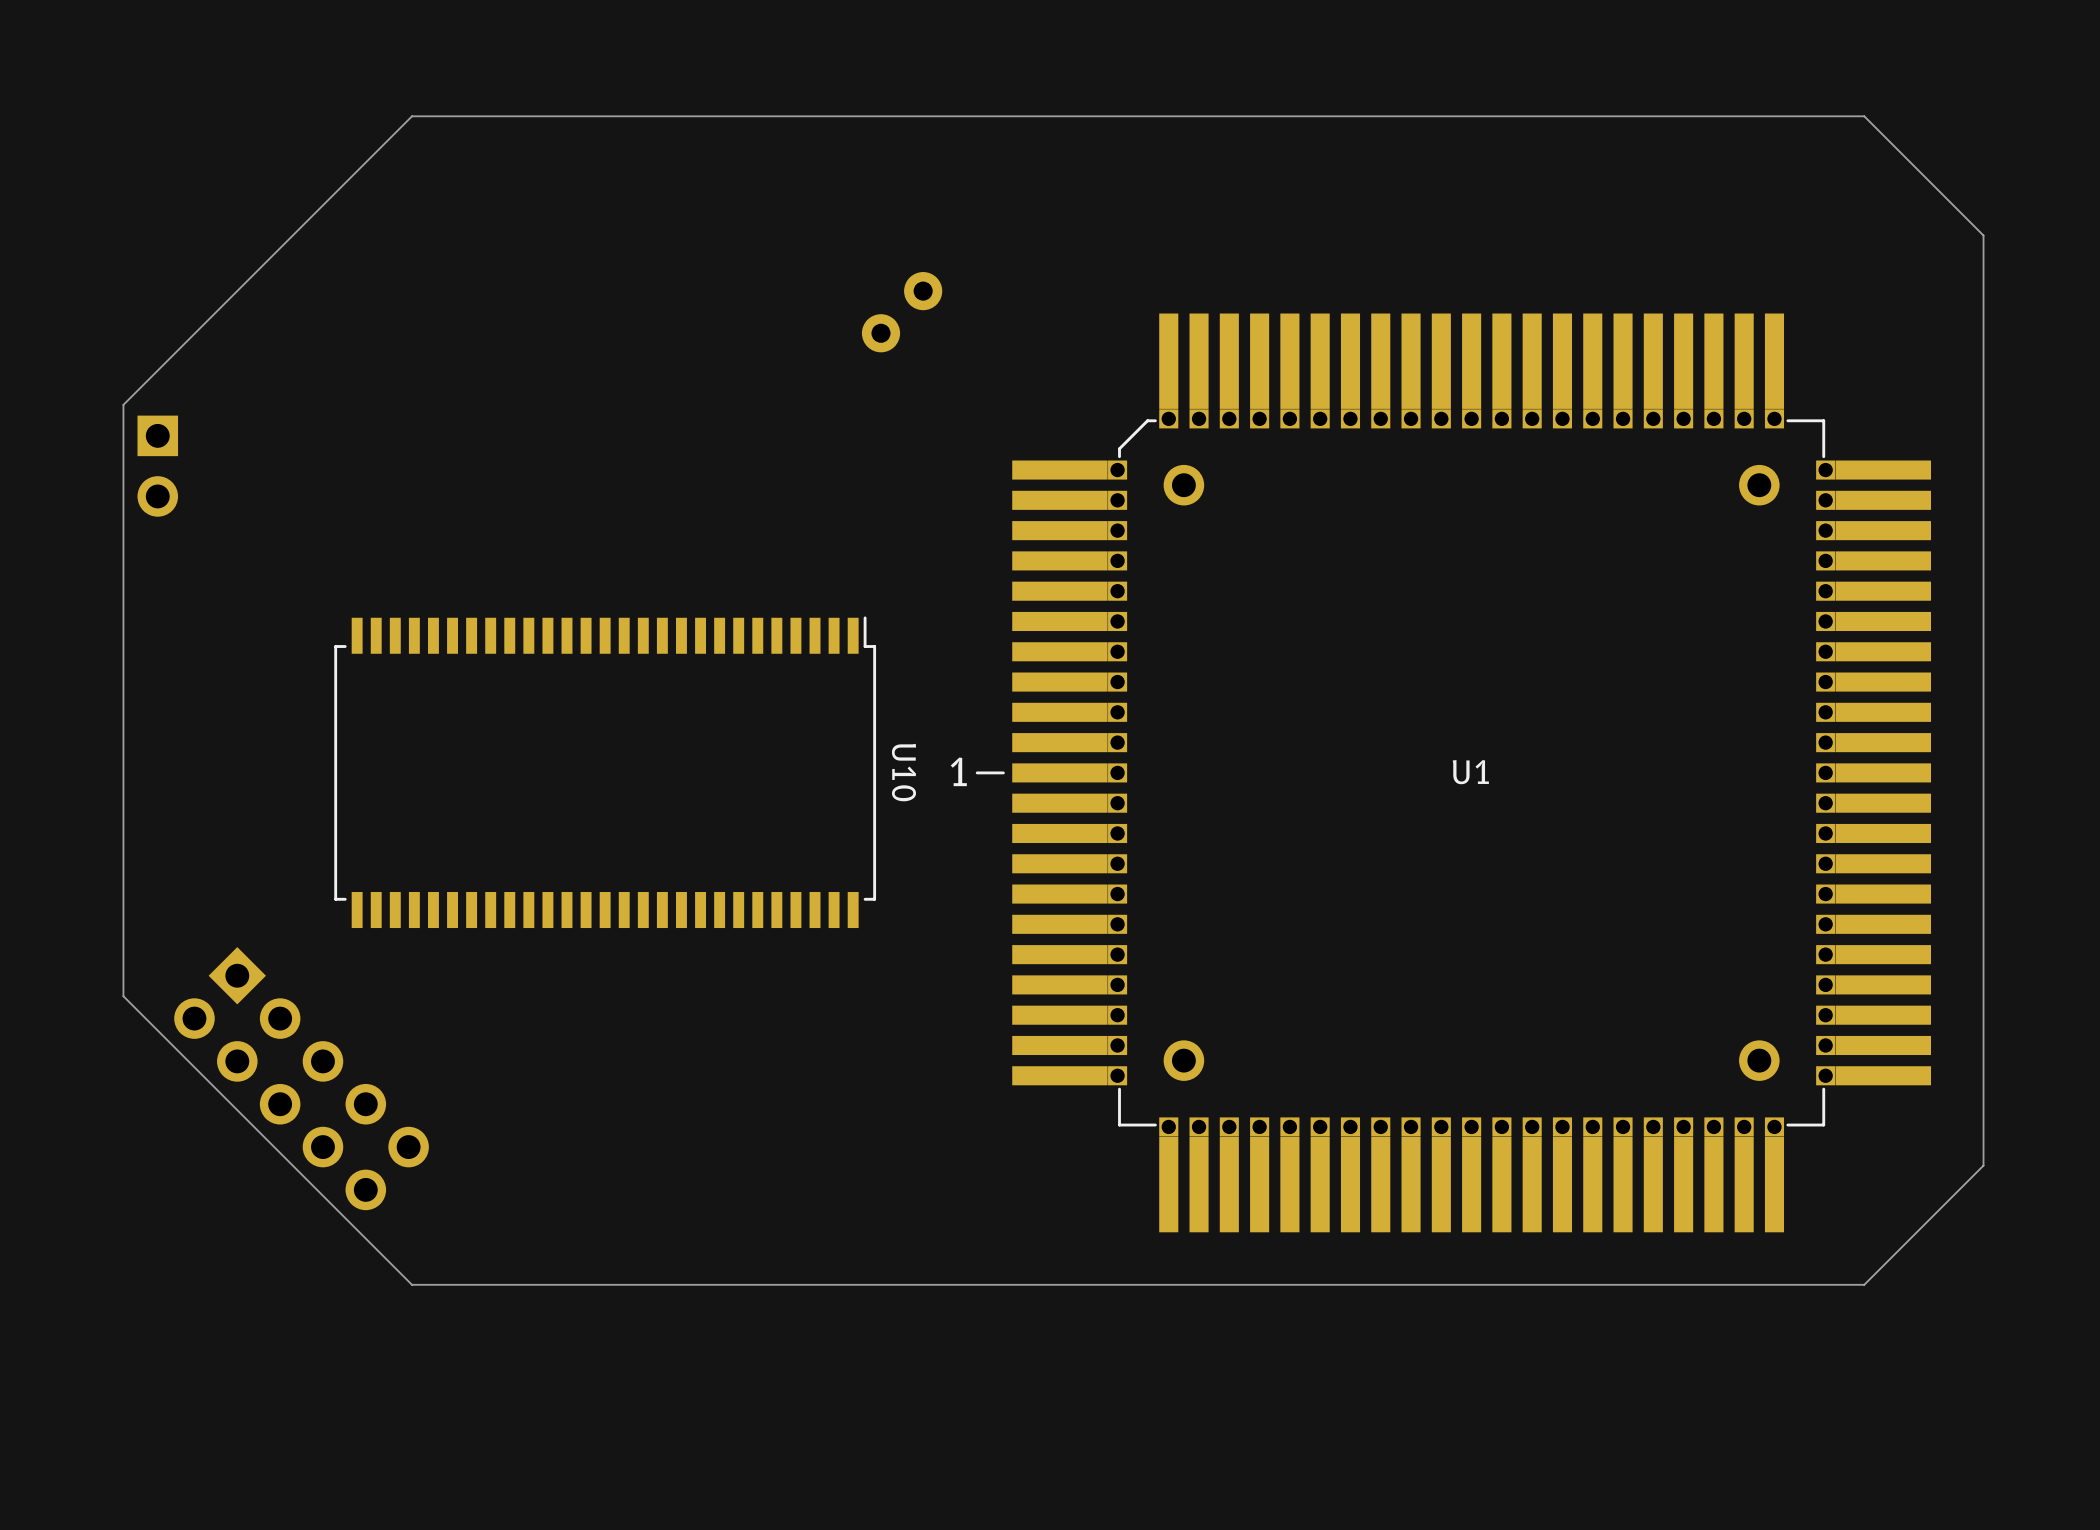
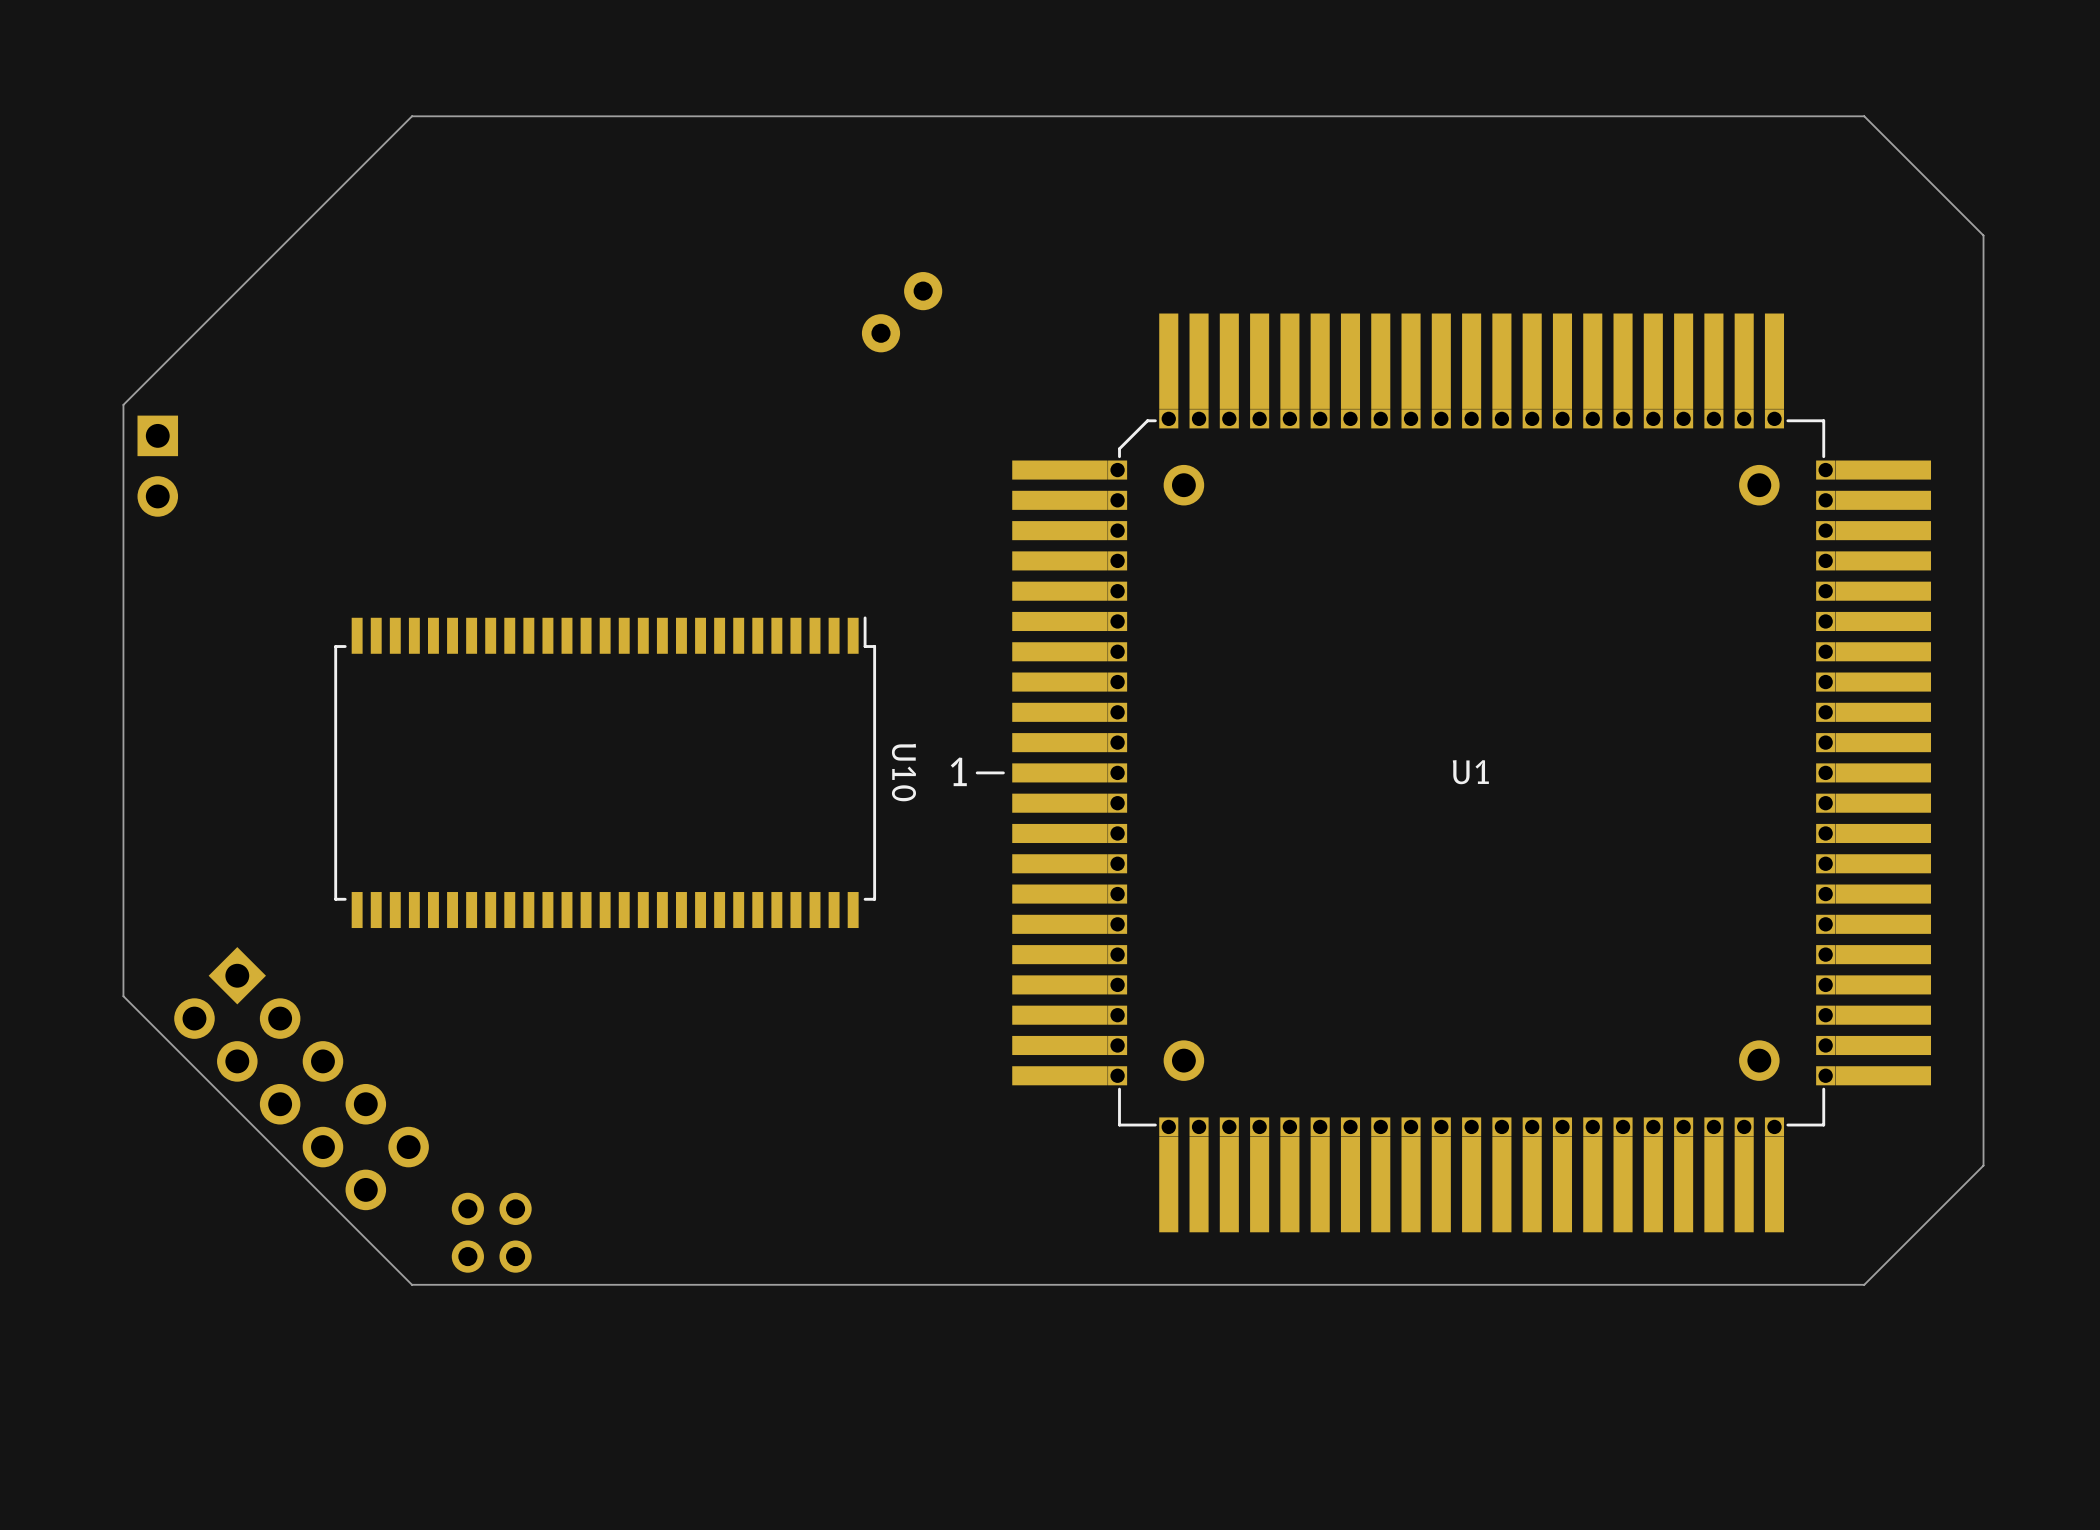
part: none -> (491, 1232)

